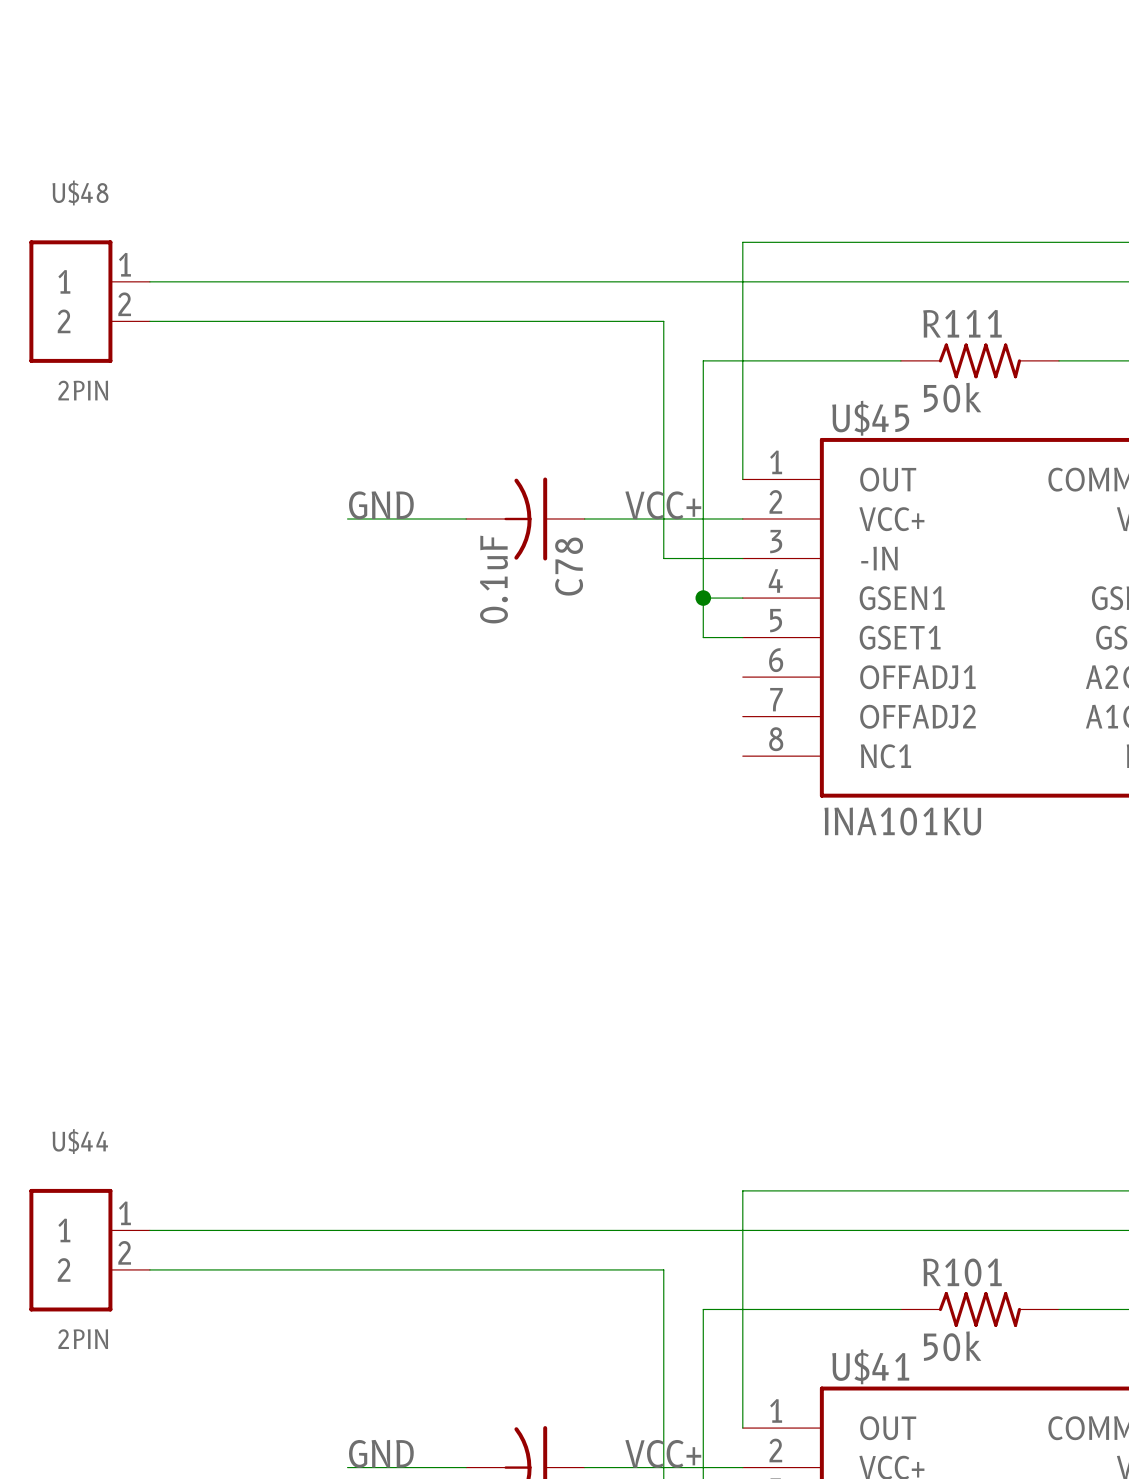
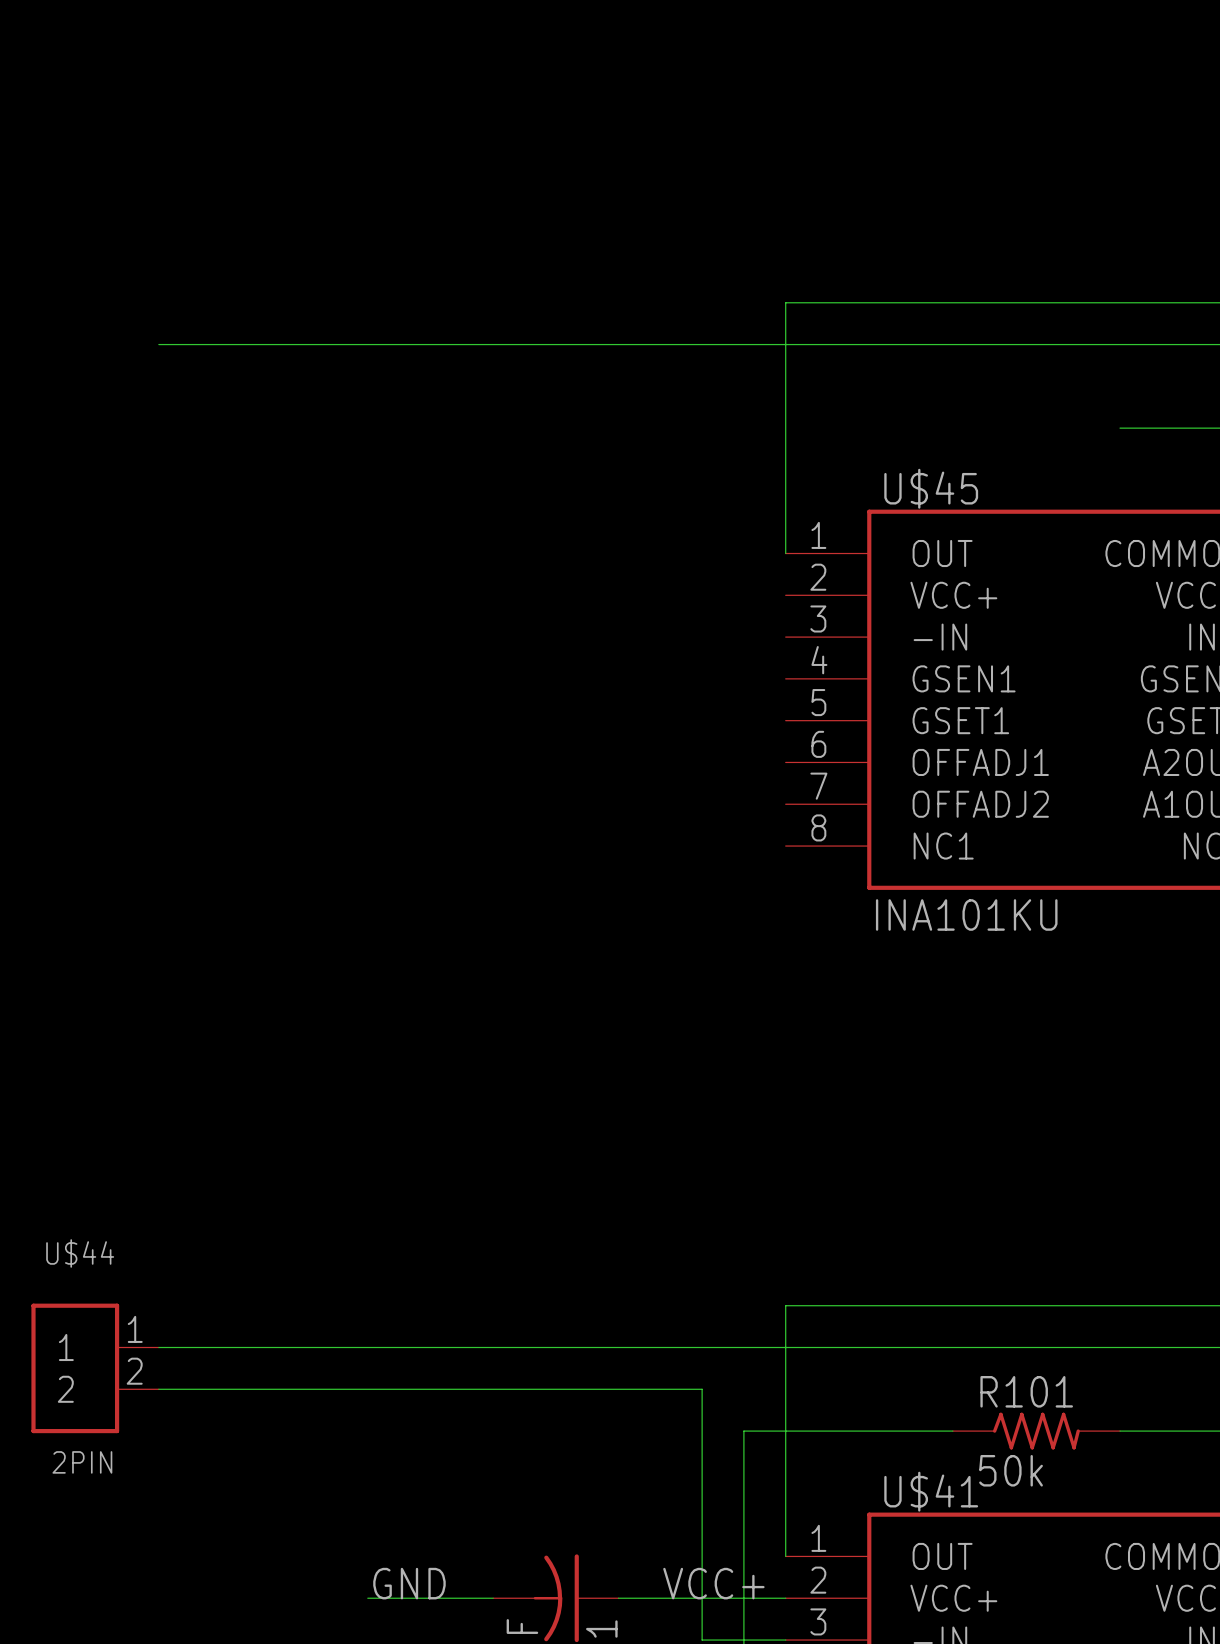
U$48: 2PIN (89, 301) -> none
wire: (149, 321) (663, 321) (663, 558) (742, 558) -> none
wire: (900, 360) (703, 360) (703, 637) (742, 637) -> none
R111: 50k (979, 360) -> none
label: GND (381, 505) -> none
label: VCC+ (663, 505) -> none
wire: (347, 518) (466, 518) -> none
C78: 0.1uF (525, 518) -> none
wire: (584, 518) (742, 518) -> none
wire: (703, 598) (742, 598) -> none
junction: (703, 598) -> none

